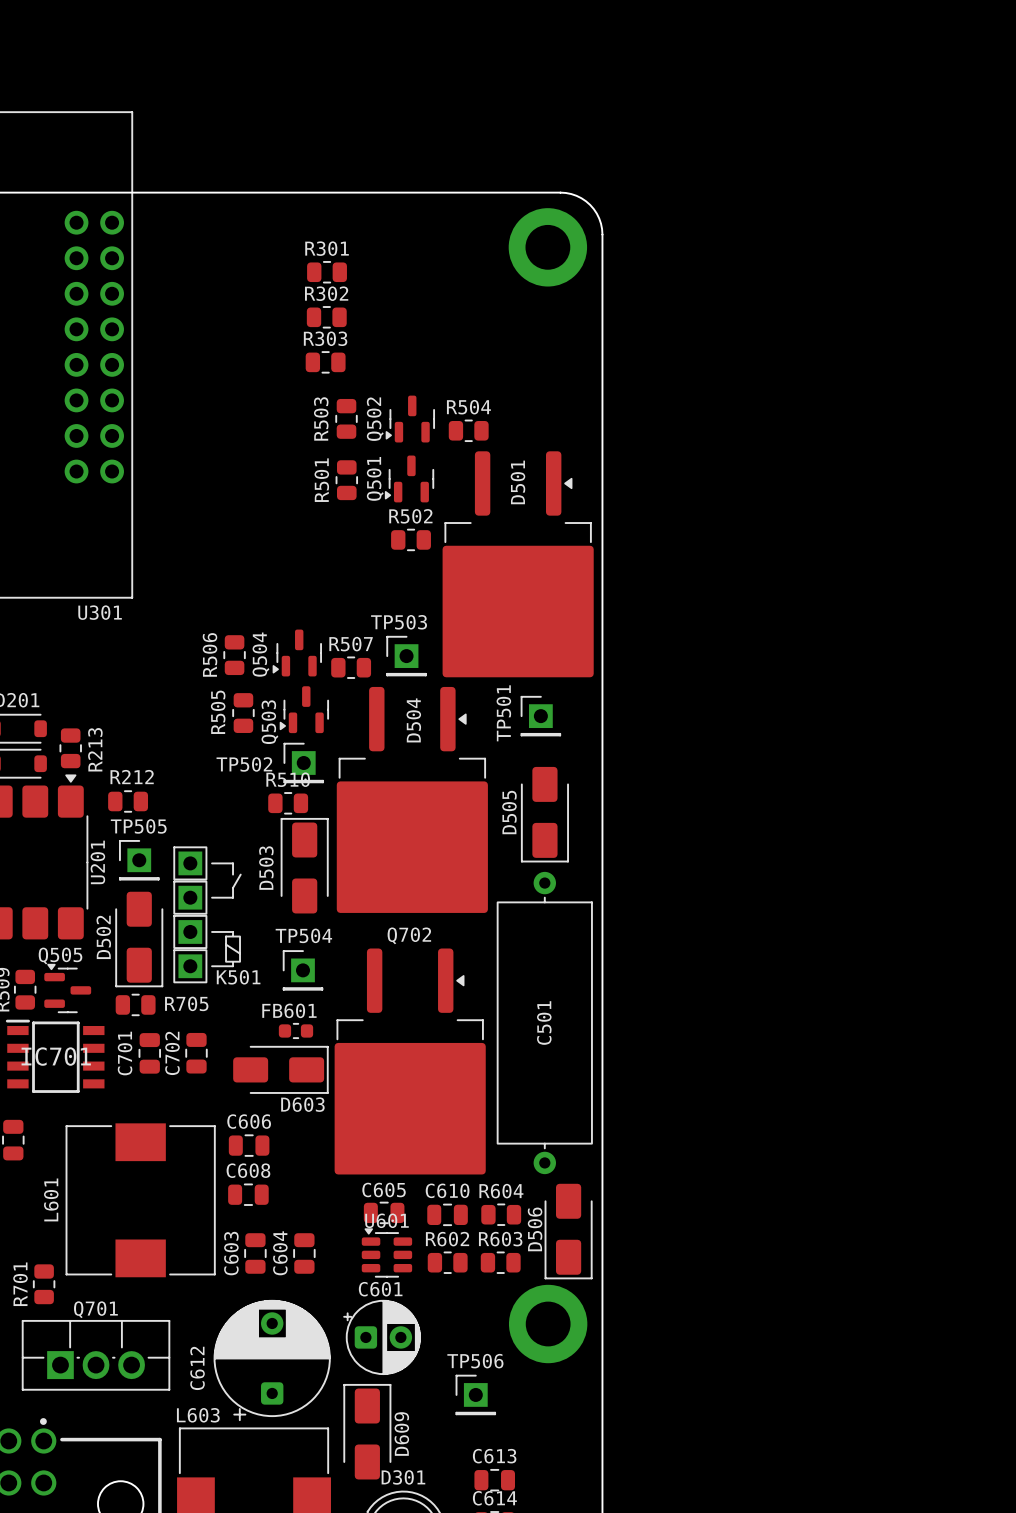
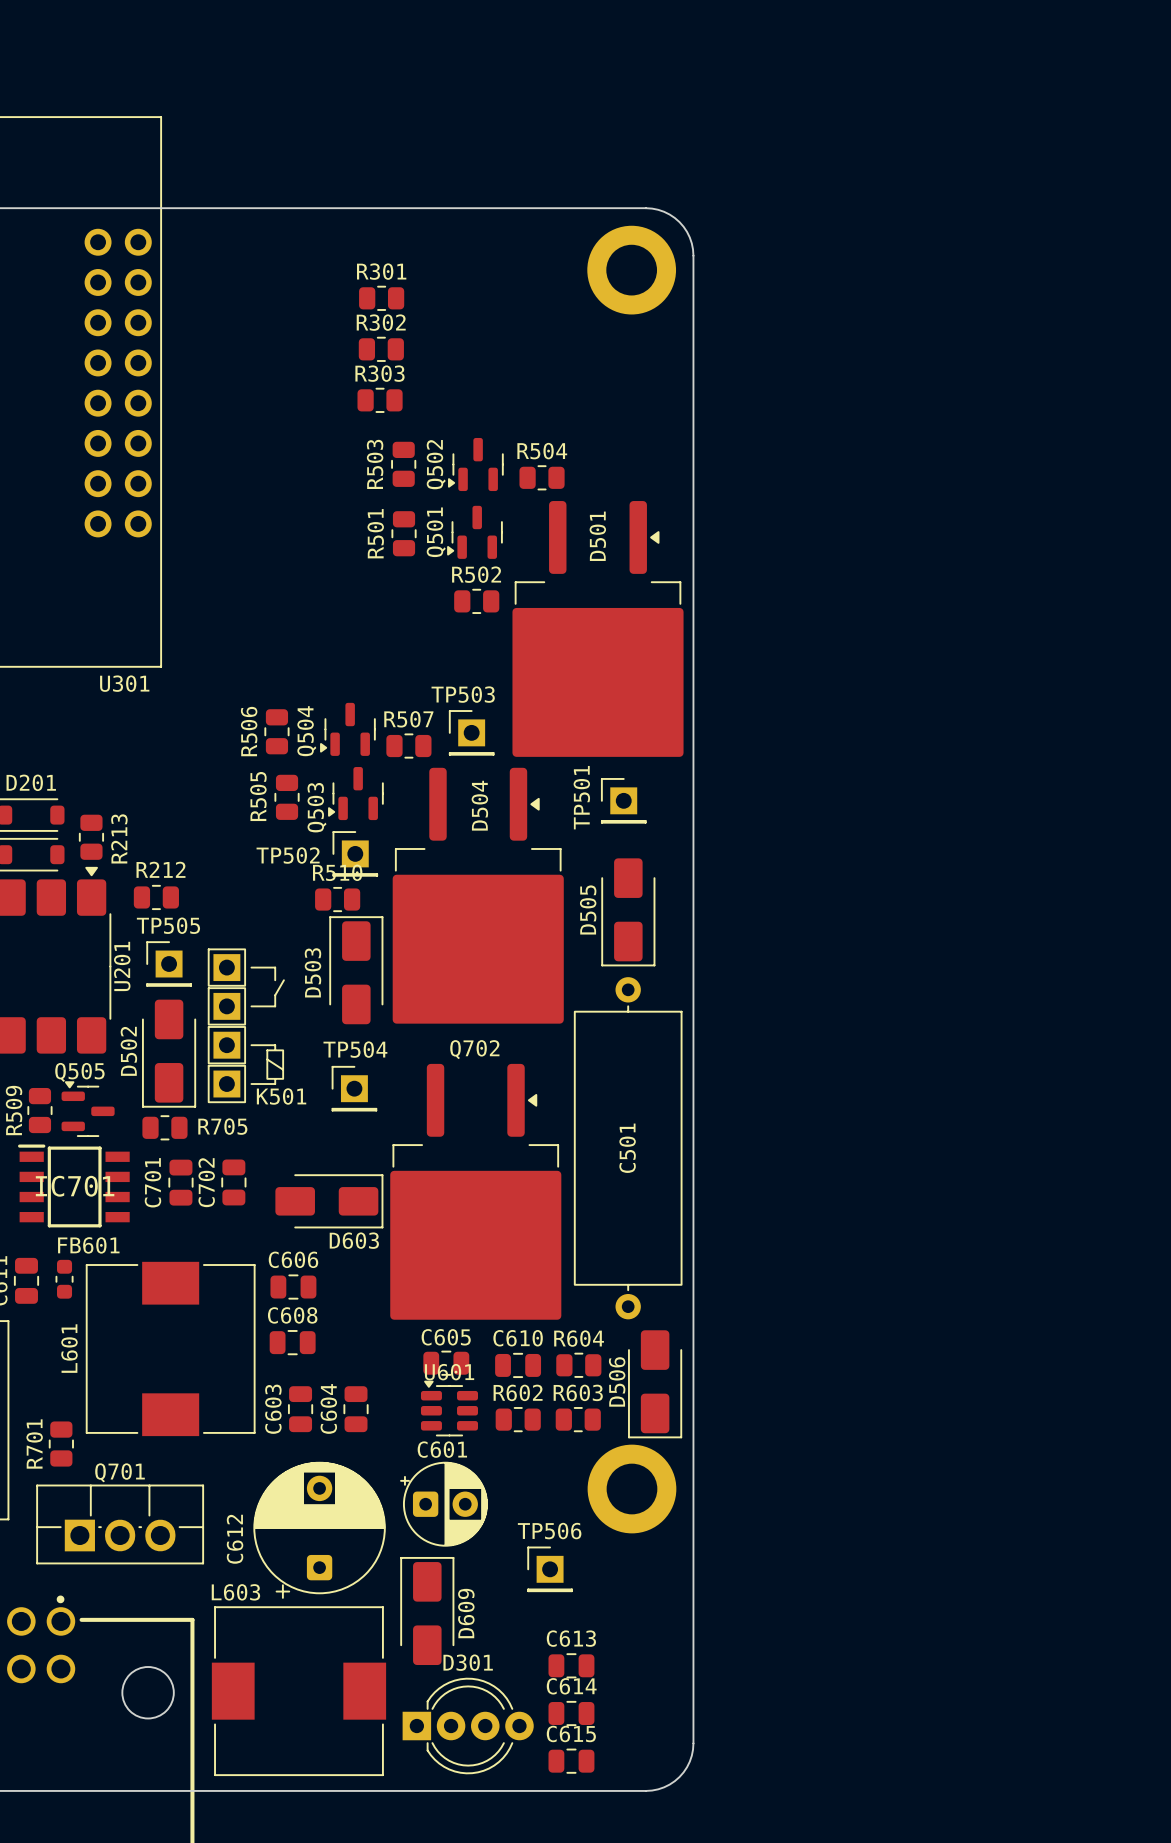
FB601 rotation: 0° (295, 1030) -> 90° clockwise (64, 1279)
FB601 position: (295, 1030) -> (64, 1279)

